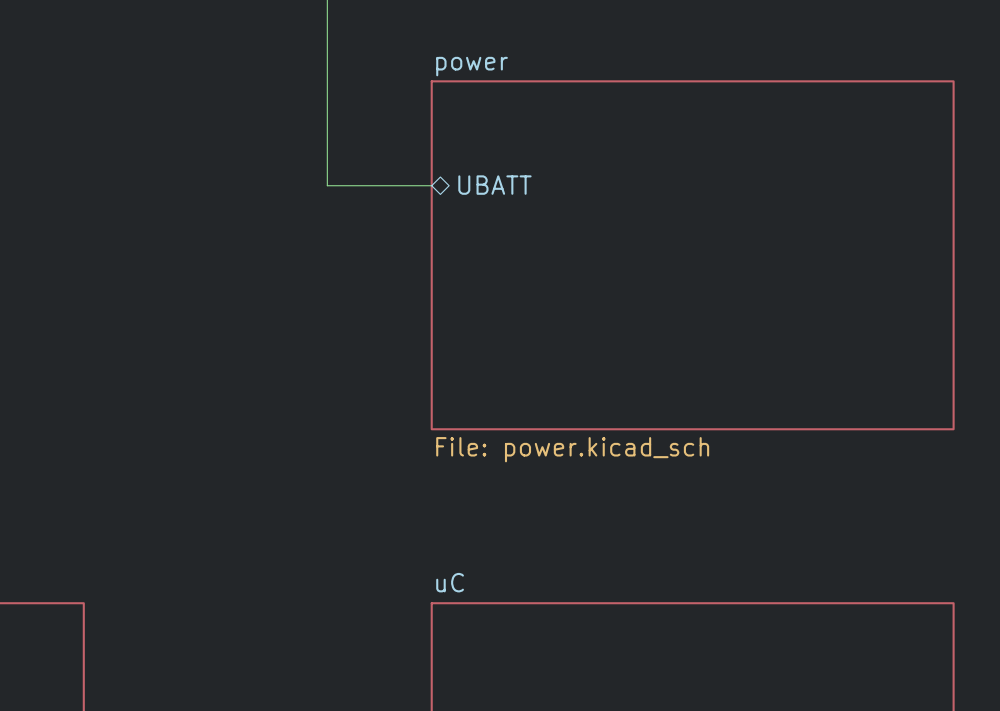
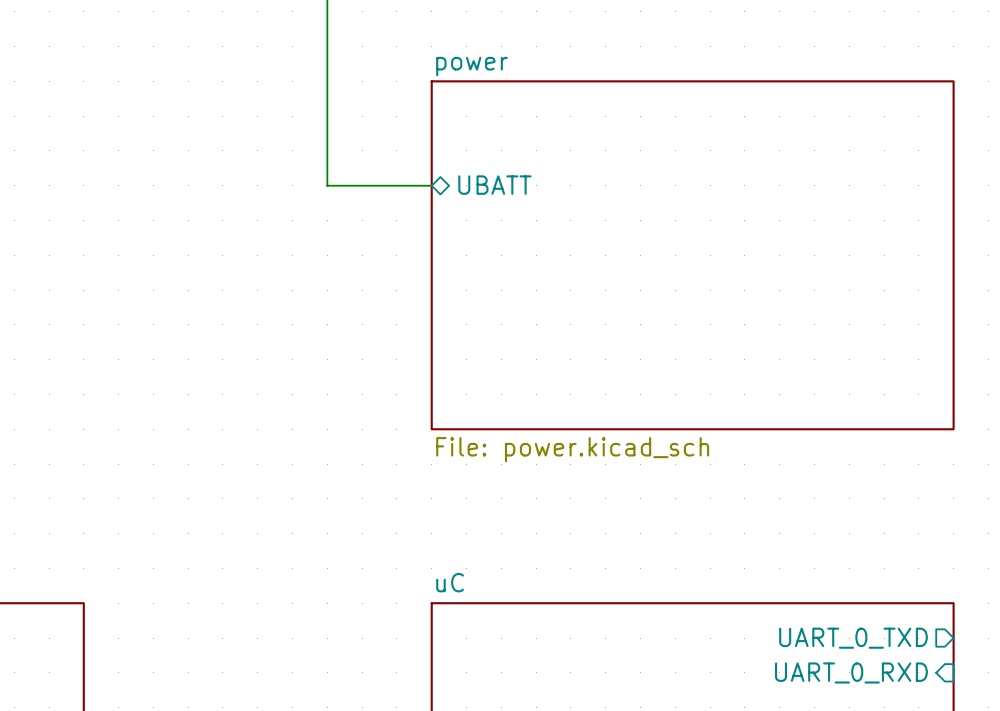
sheet pin: none -> UART_0_TXD (853, 638)
sheet pin: none -> UART_0_RXD (851, 672)

